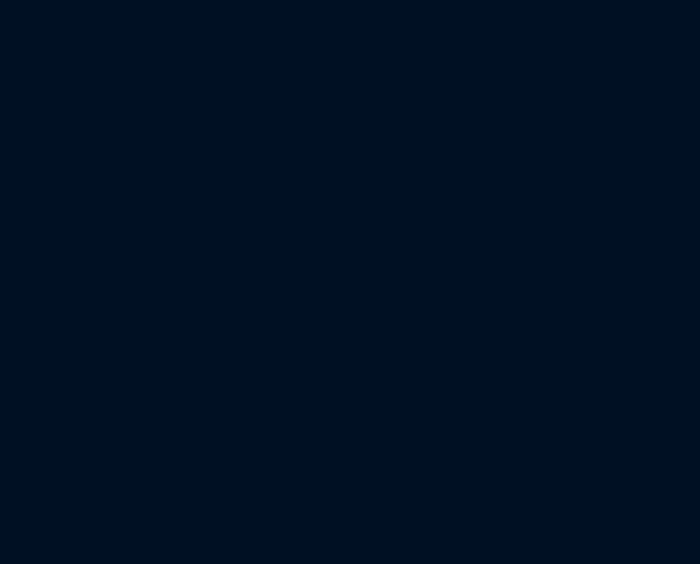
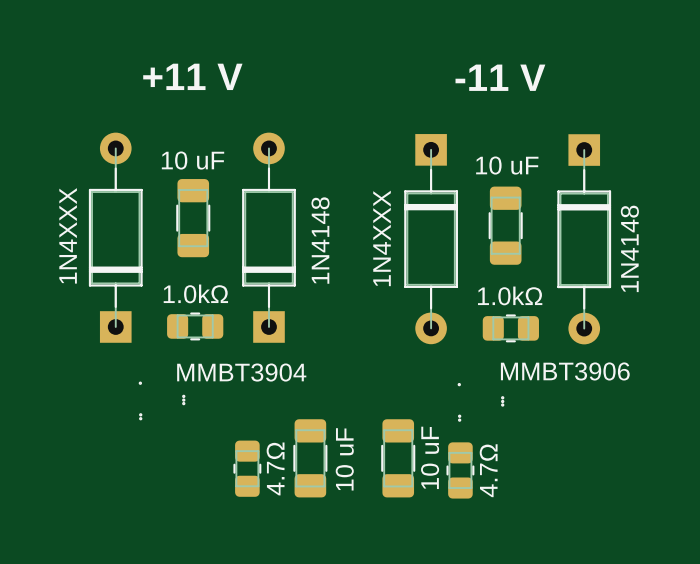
text: none -> +11 V (192, 76)
text: none -> -11 V (500, 77)
10 uF: none -> (193, 218)
10 uF: none -> (505, 225)
1N4XXX: none -> (115, 237)
1N4148: none -> (268, 237)
1N4XXX: none -> (431, 239)
1N4148: none -> (584, 239)
1.0kΩ: none -> (195, 326)
1.0kΩ: none -> (510, 328)
MMBT3904: none -> (162, 400)
MMBT3906: none -> (481, 402)
10 uF: none -> (310, 458)
10 uF: none -> (398, 458)
4.7Ω: none -> (247, 468)
4.7Ω: none -> (460, 470)

